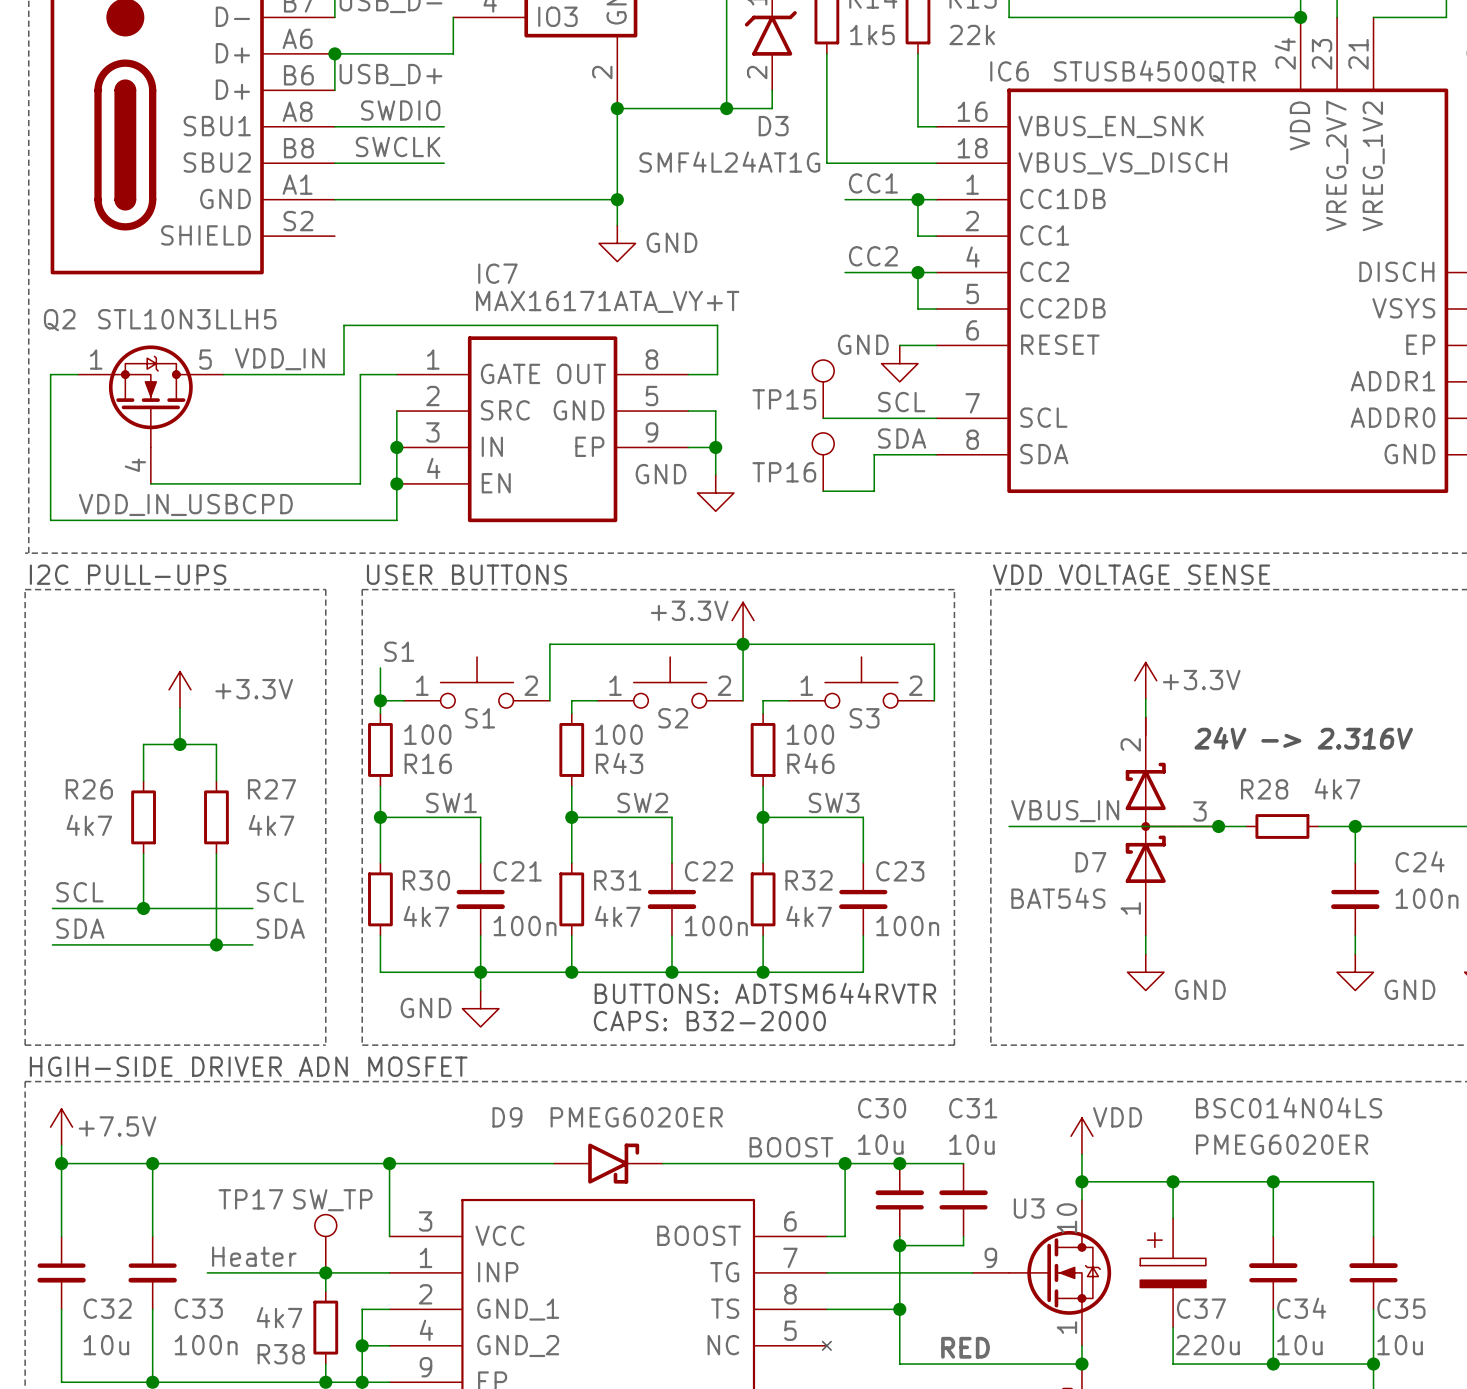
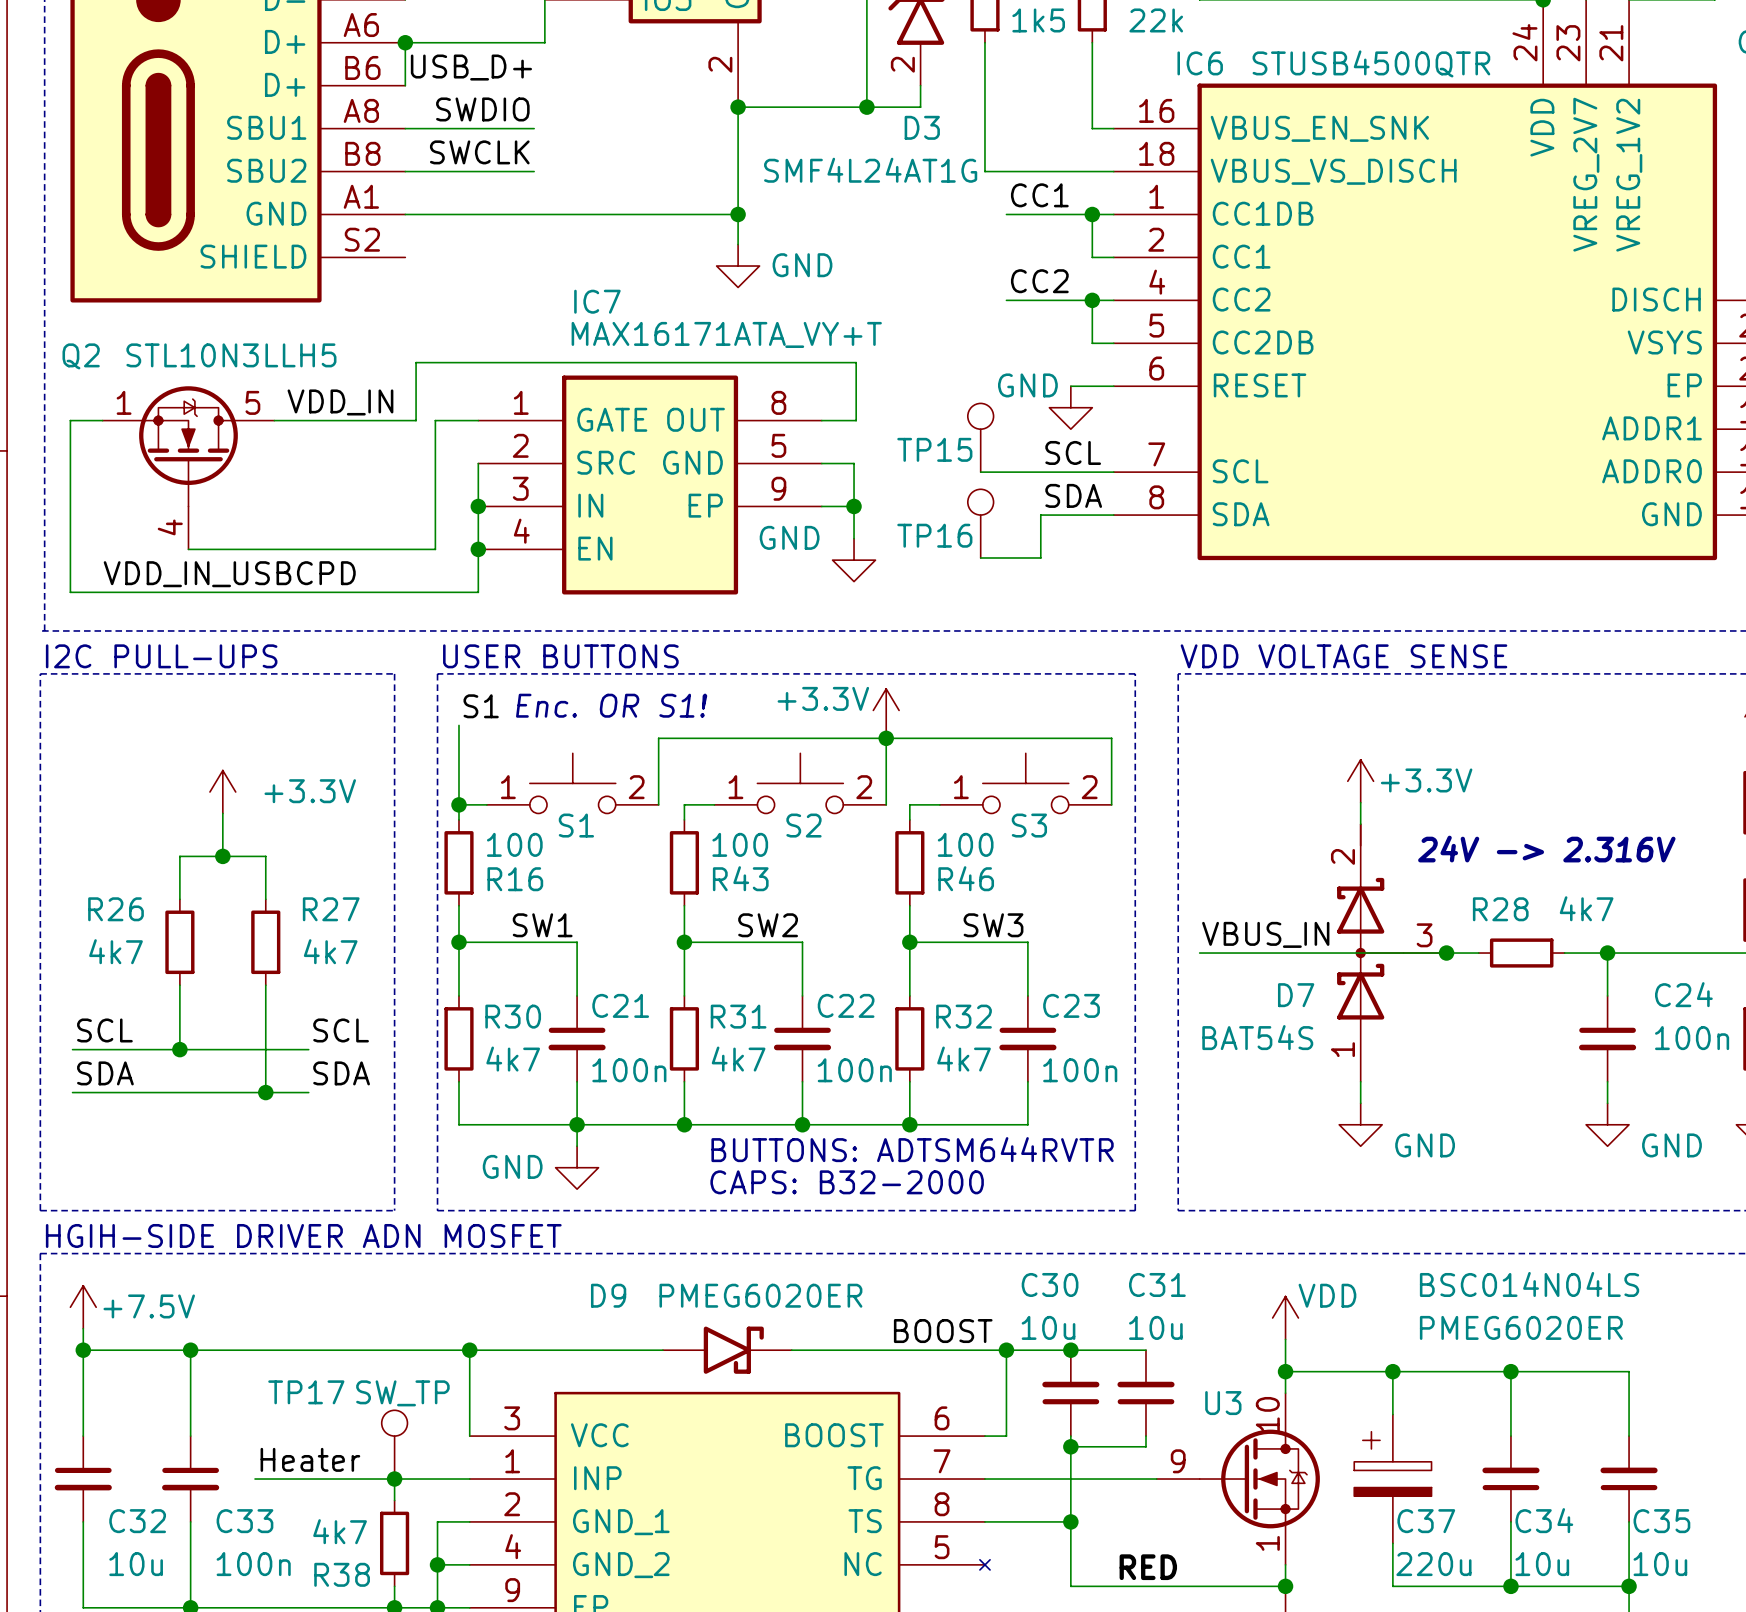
text: none -> Enc. OR S1! (611, 705)
wire: none -> (458, 725) (458, 766)
label position: S1 (399, 651) -> S1 (481, 706)

